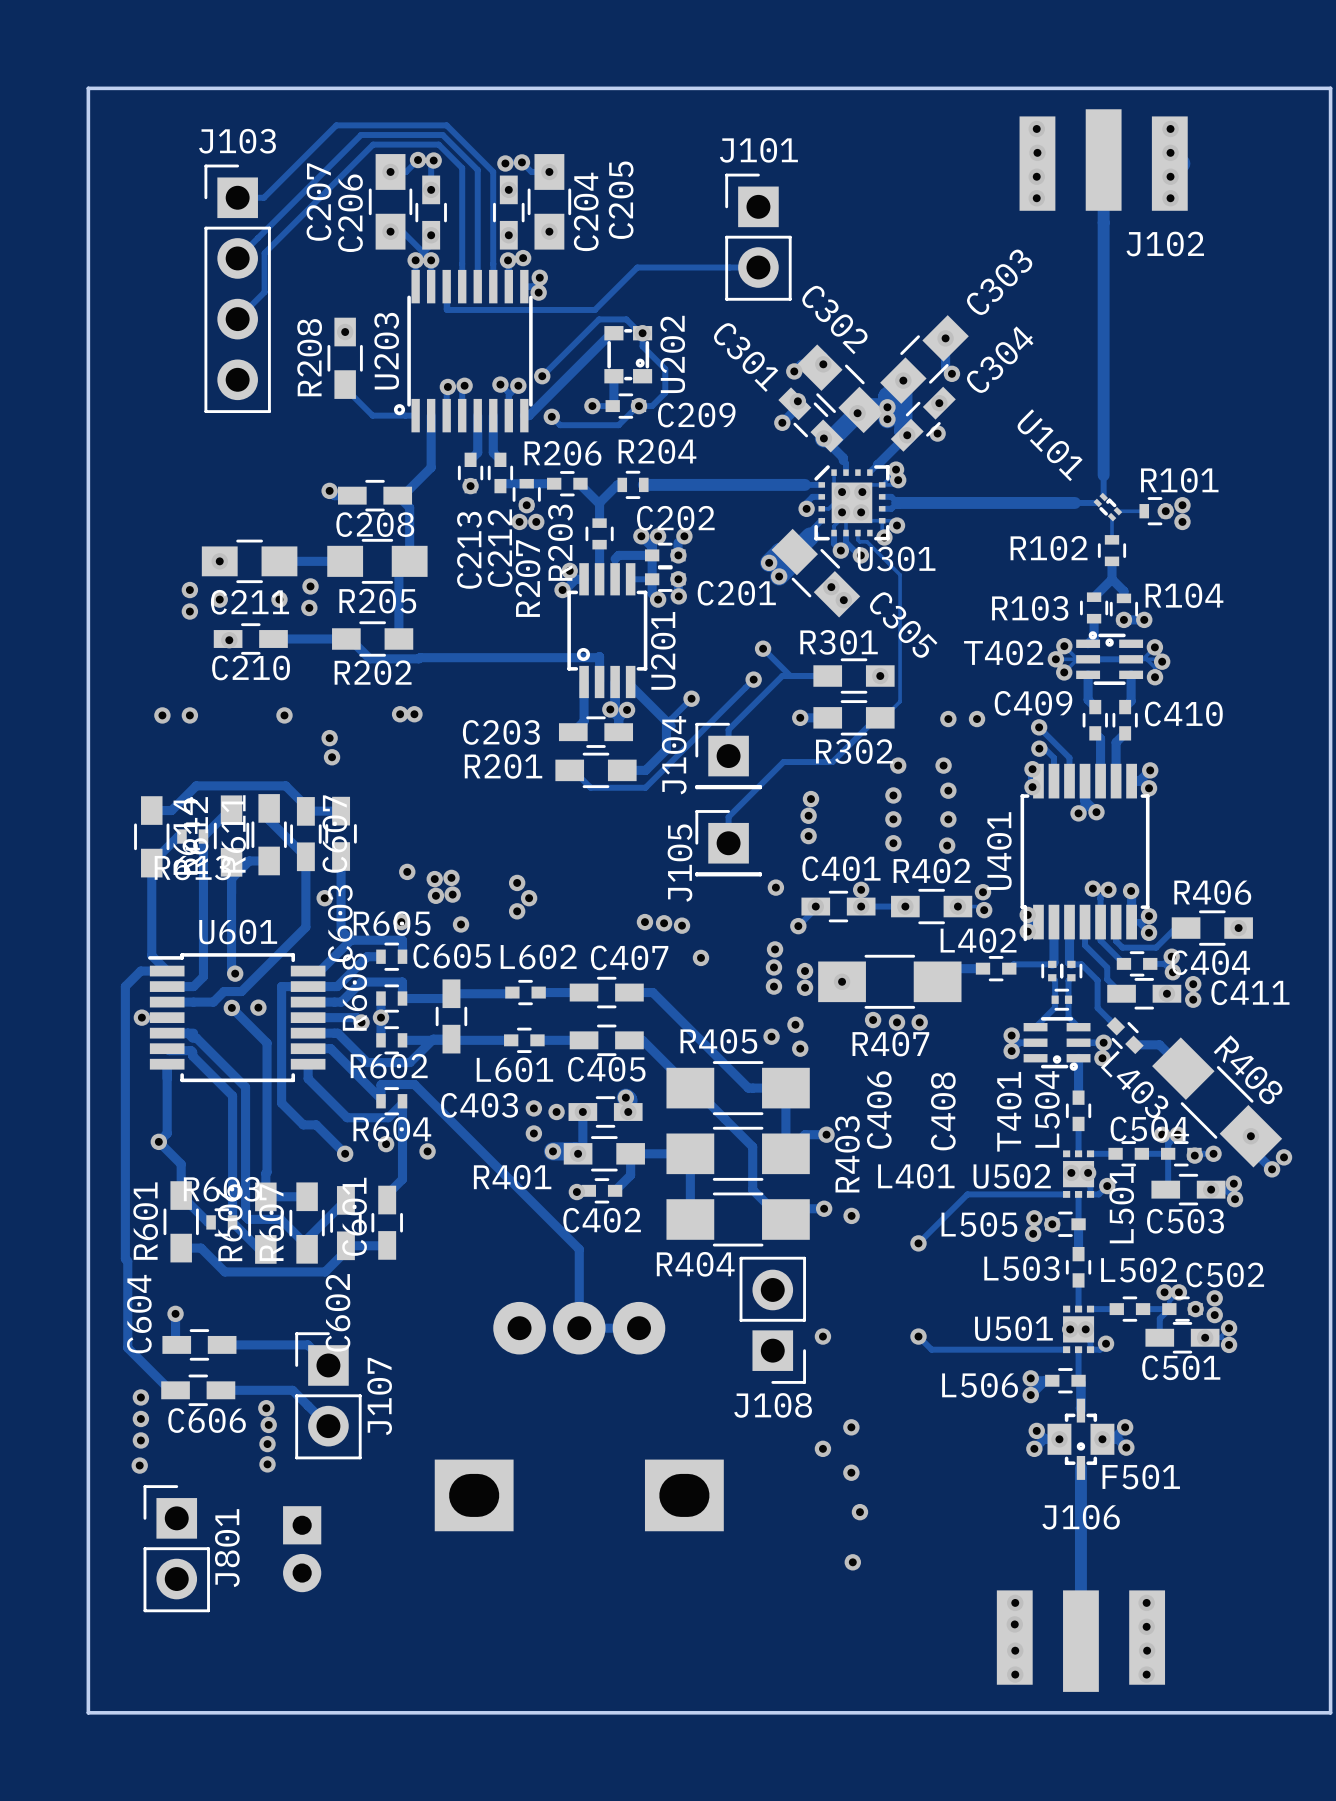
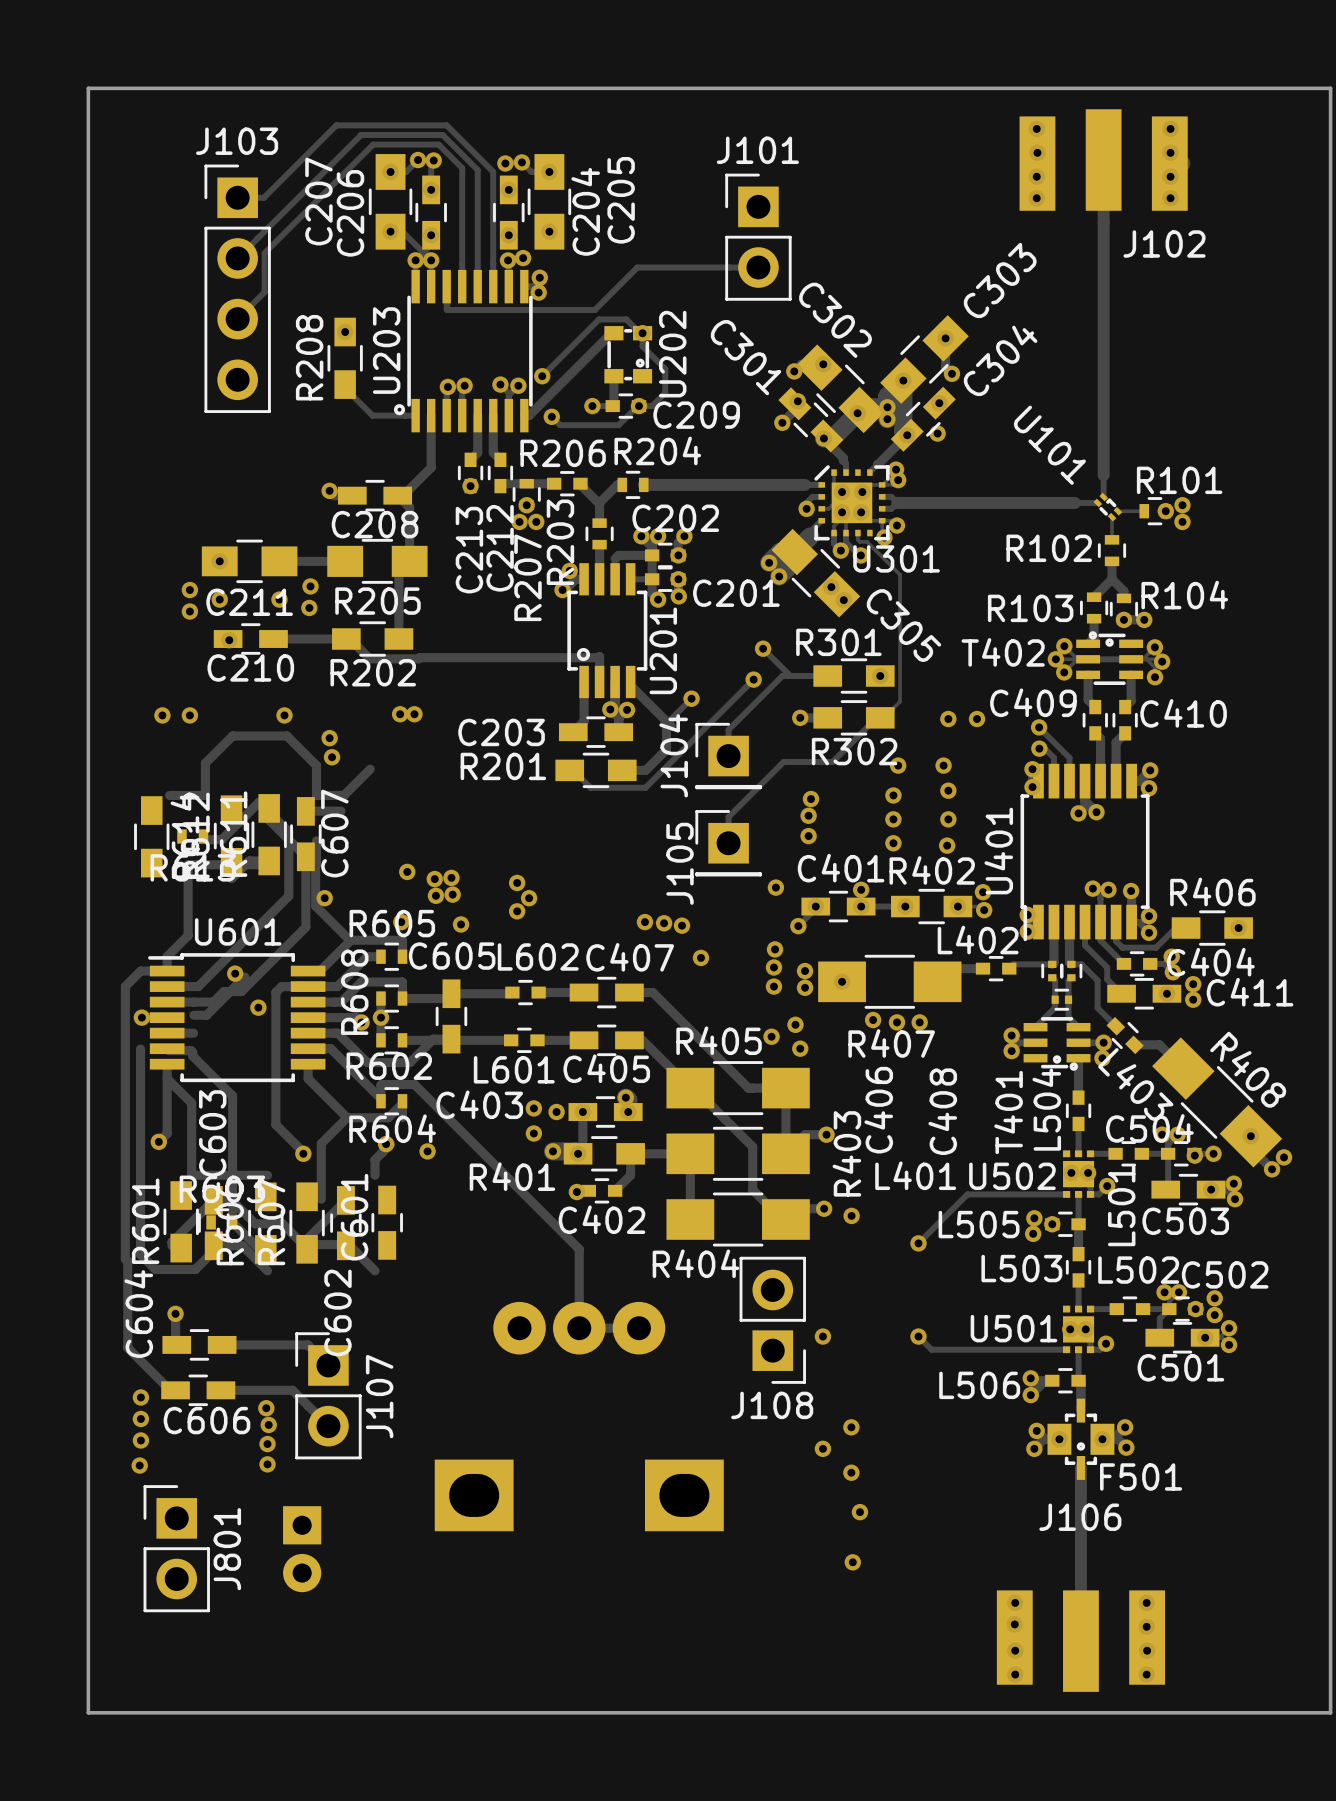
track: none -> (370, 769) (343, 795) (316, 795) (316, 765) (286, 735) (232, 735) (205, 763) (204, 795) (169, 795)
track: (231, 809) (203, 836) (203, 976) (193, 986) -> (205, 839) (221, 839) (259, 802) (288, 831) (288, 896) (198, 986) (193, 986)
track: (151, 810) (171, 810) (196, 785) (285, 785) (305, 806) (305, 811) -> none
C603 position: (341, 833) -> (213, 1223)
track: (181, 836) (178, 836) (151, 863) (151, 955) (167, 971) -> (259, 864) (188, 864) (188, 935) (167, 956) (167, 971)
track: none -> (316, 840) (315, 906) (349, 940)
track: (341, 856) (341, 930) (350, 940) -> none
track: (231, 862) (231, 970) (235, 973) -> none
C603 name position: C603 (340, 923) -> C603 (212, 1133)
track: none -> (244, 977) (206, 1015) (193, 1015)
track: (281, 986) (281, 1103) (303, 1124) (316, 1124) (345, 1153) -> (281, 986) (275, 992) (275, 1124) (303, 1153)
track: (231, 1007) (267, 1043) (265, 1196) (307, 1196) -> none
via: (231, 1007) -> none
track: (187, 1033) (192, 1037) (196, 1037) (245, 1087) (245, 1216) (248, 1219) (280, 1219) (307, 1245) -> none
track: none -> (140, 1048) (140, 1254) (155, 1269) (195, 1269) (213, 1251) (213, 1245) (242, 1245) (267, 1270)
track: none -> (167, 1078) (191, 1103) (191, 1175) (267, 1175)
track: none -> (347, 1117) (321, 1143) (321, 1199)
track: (402, 1117) (402, 1179) (387, 1194) (387, 1200) -> none
track: (158, 1141) (181, 1164) (181, 1195) (208, 1222) (211, 1222) -> none
track: none -> (390, 1144) (375, 1159) (375, 1175)
via position: (345, 1153) -> (303, 1153)
track: none -> (171, 1245) (171, 1242) (213, 1200) (231, 1200) (255, 1223) (282, 1223) (303, 1244) (348, 1244) (375, 1270)
track: (387, 1245) (345, 1245) (345, 1251) (325, 1271) (224, 1271) (201, 1248) (181, 1248) -> none

